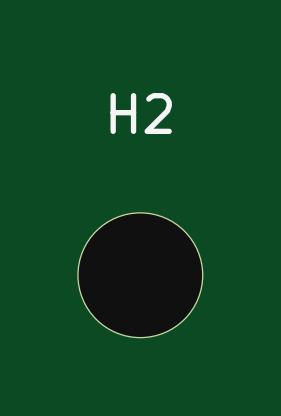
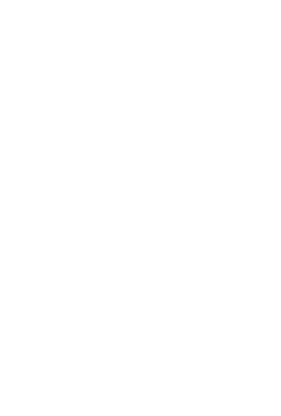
H2: (140, 275) -> none

